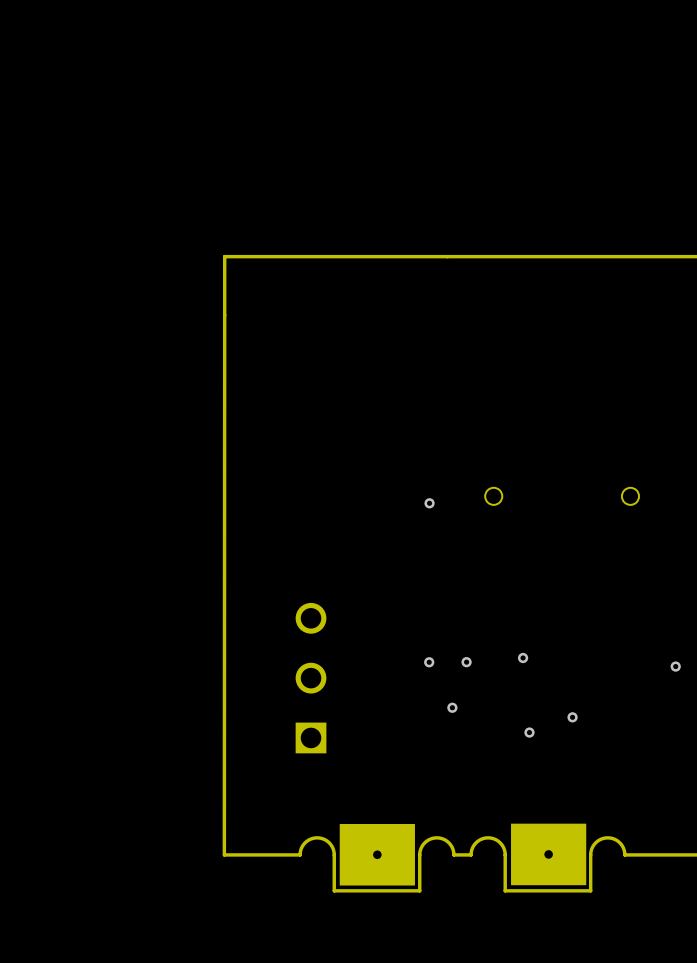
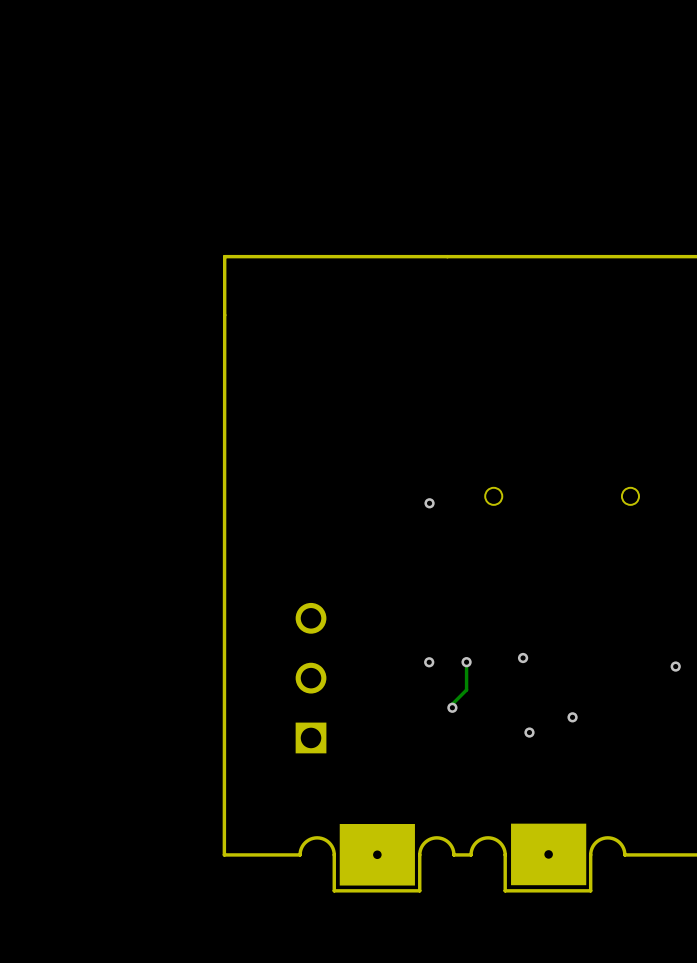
track: none -> (466, 662) (466, 689) (452, 704) (452, 707)

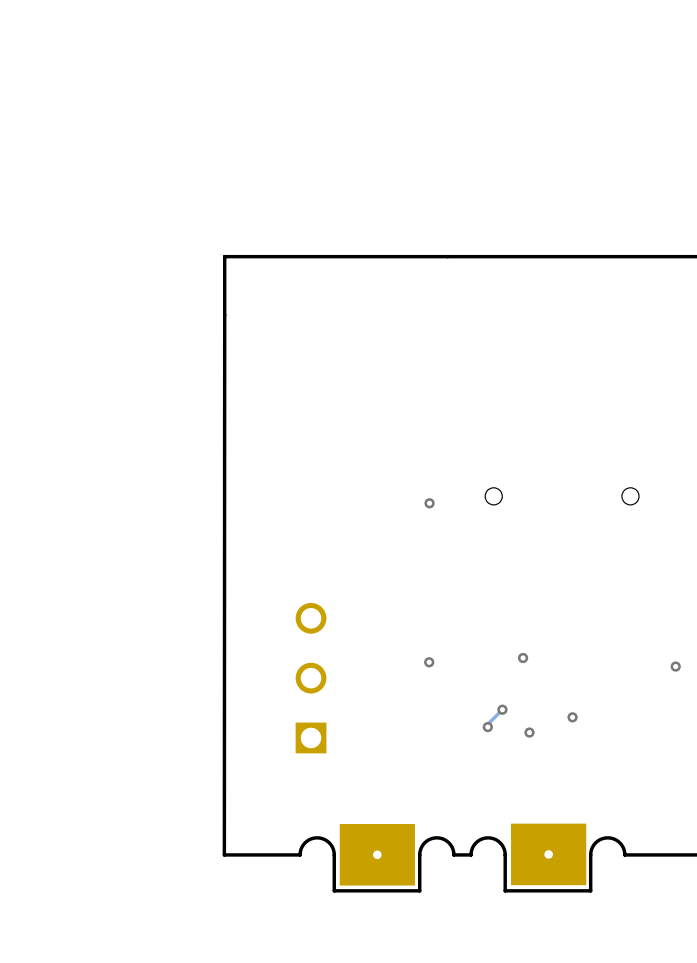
track: (466, 662) (466, 689) (452, 704) (452, 707) -> none
via: (466, 662) -> none
via: (452, 707) -> none
track: none -> (502, 709) (487, 724) (487, 727)
via: none -> (502, 709)
via: none -> (487, 727)

